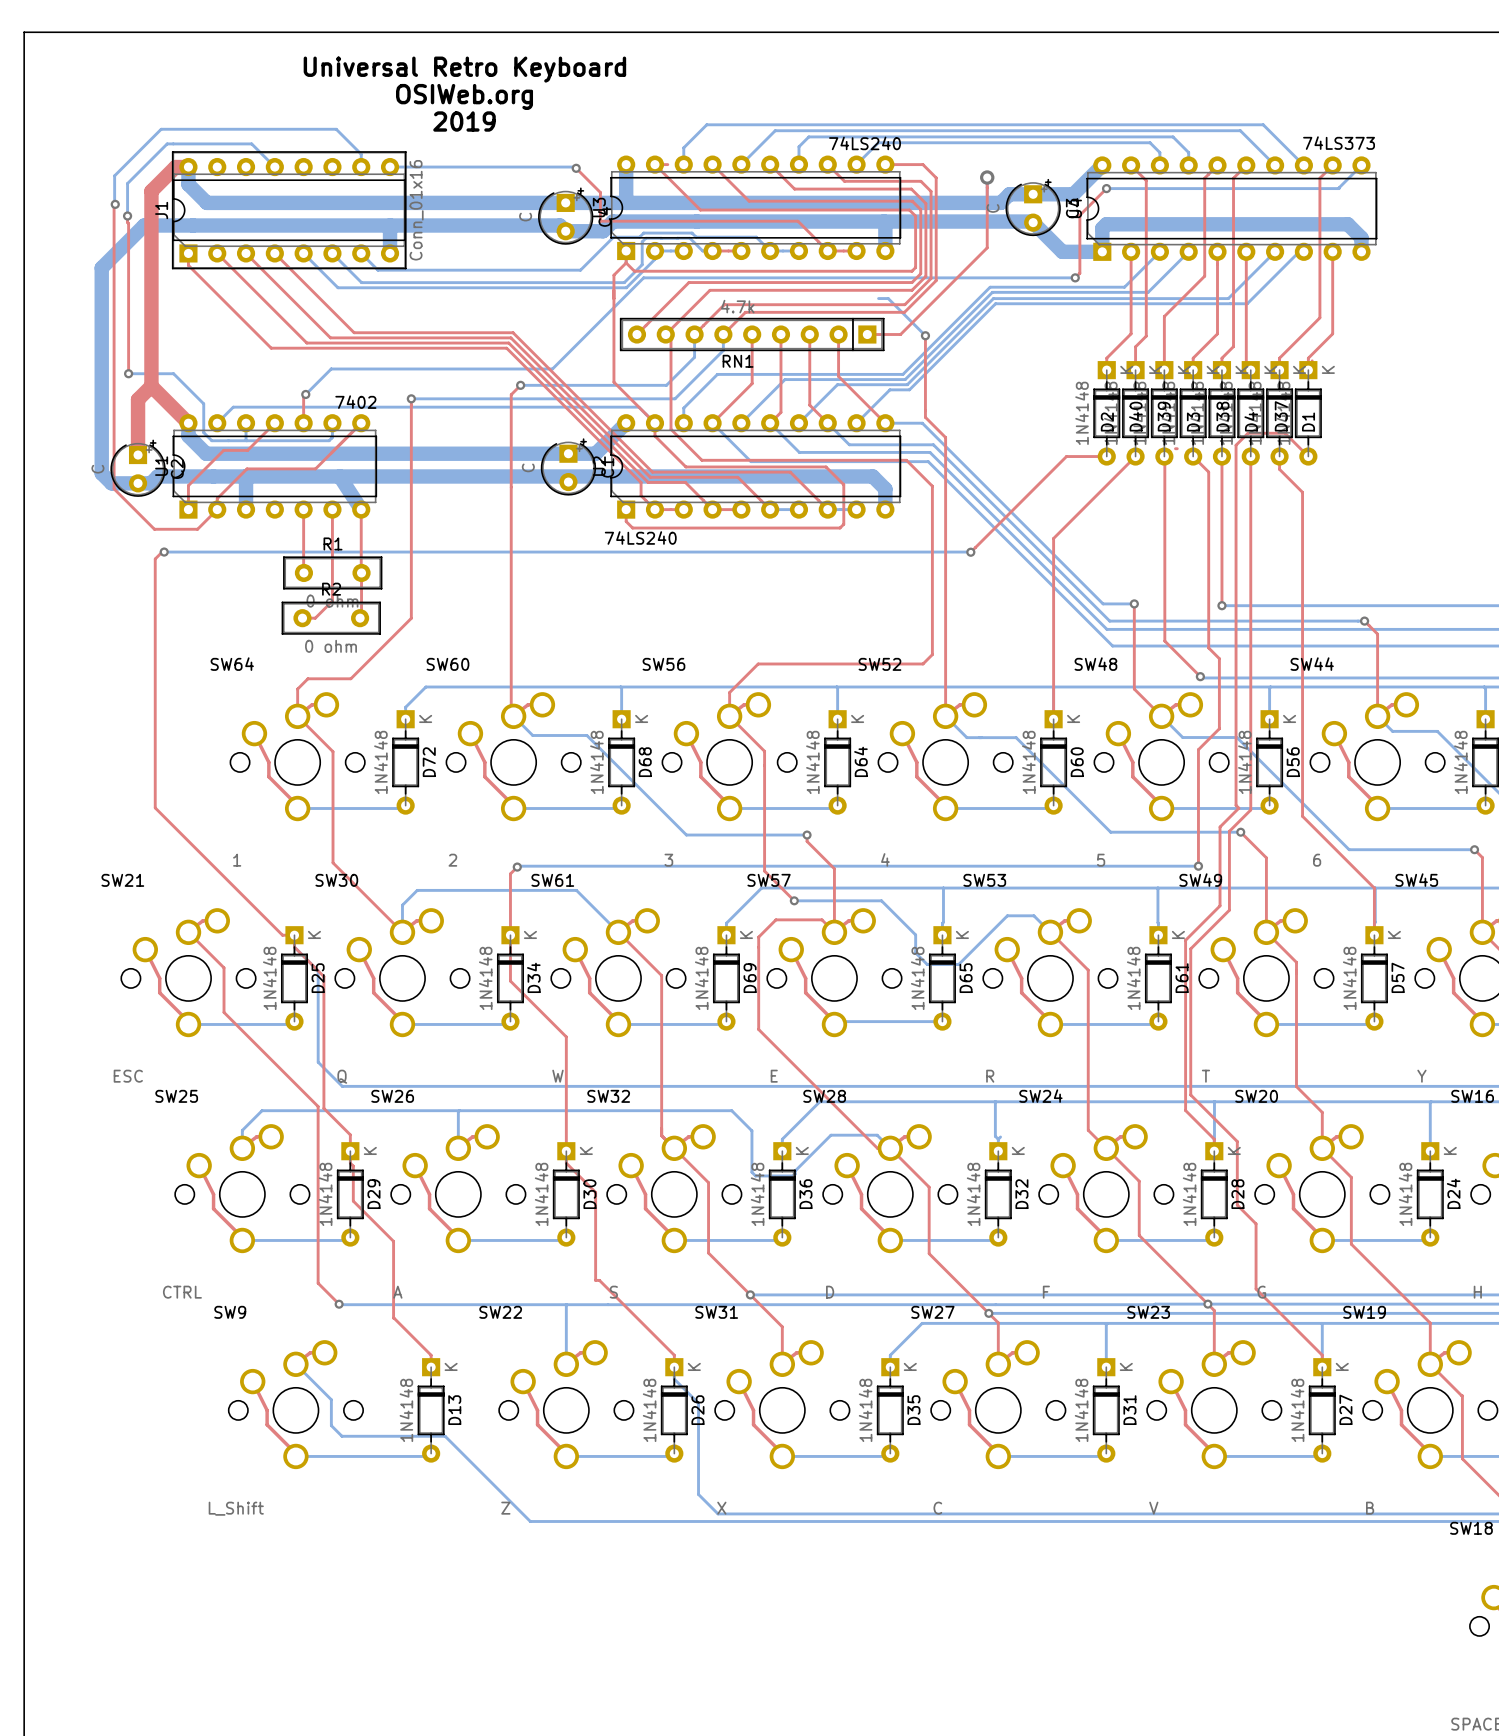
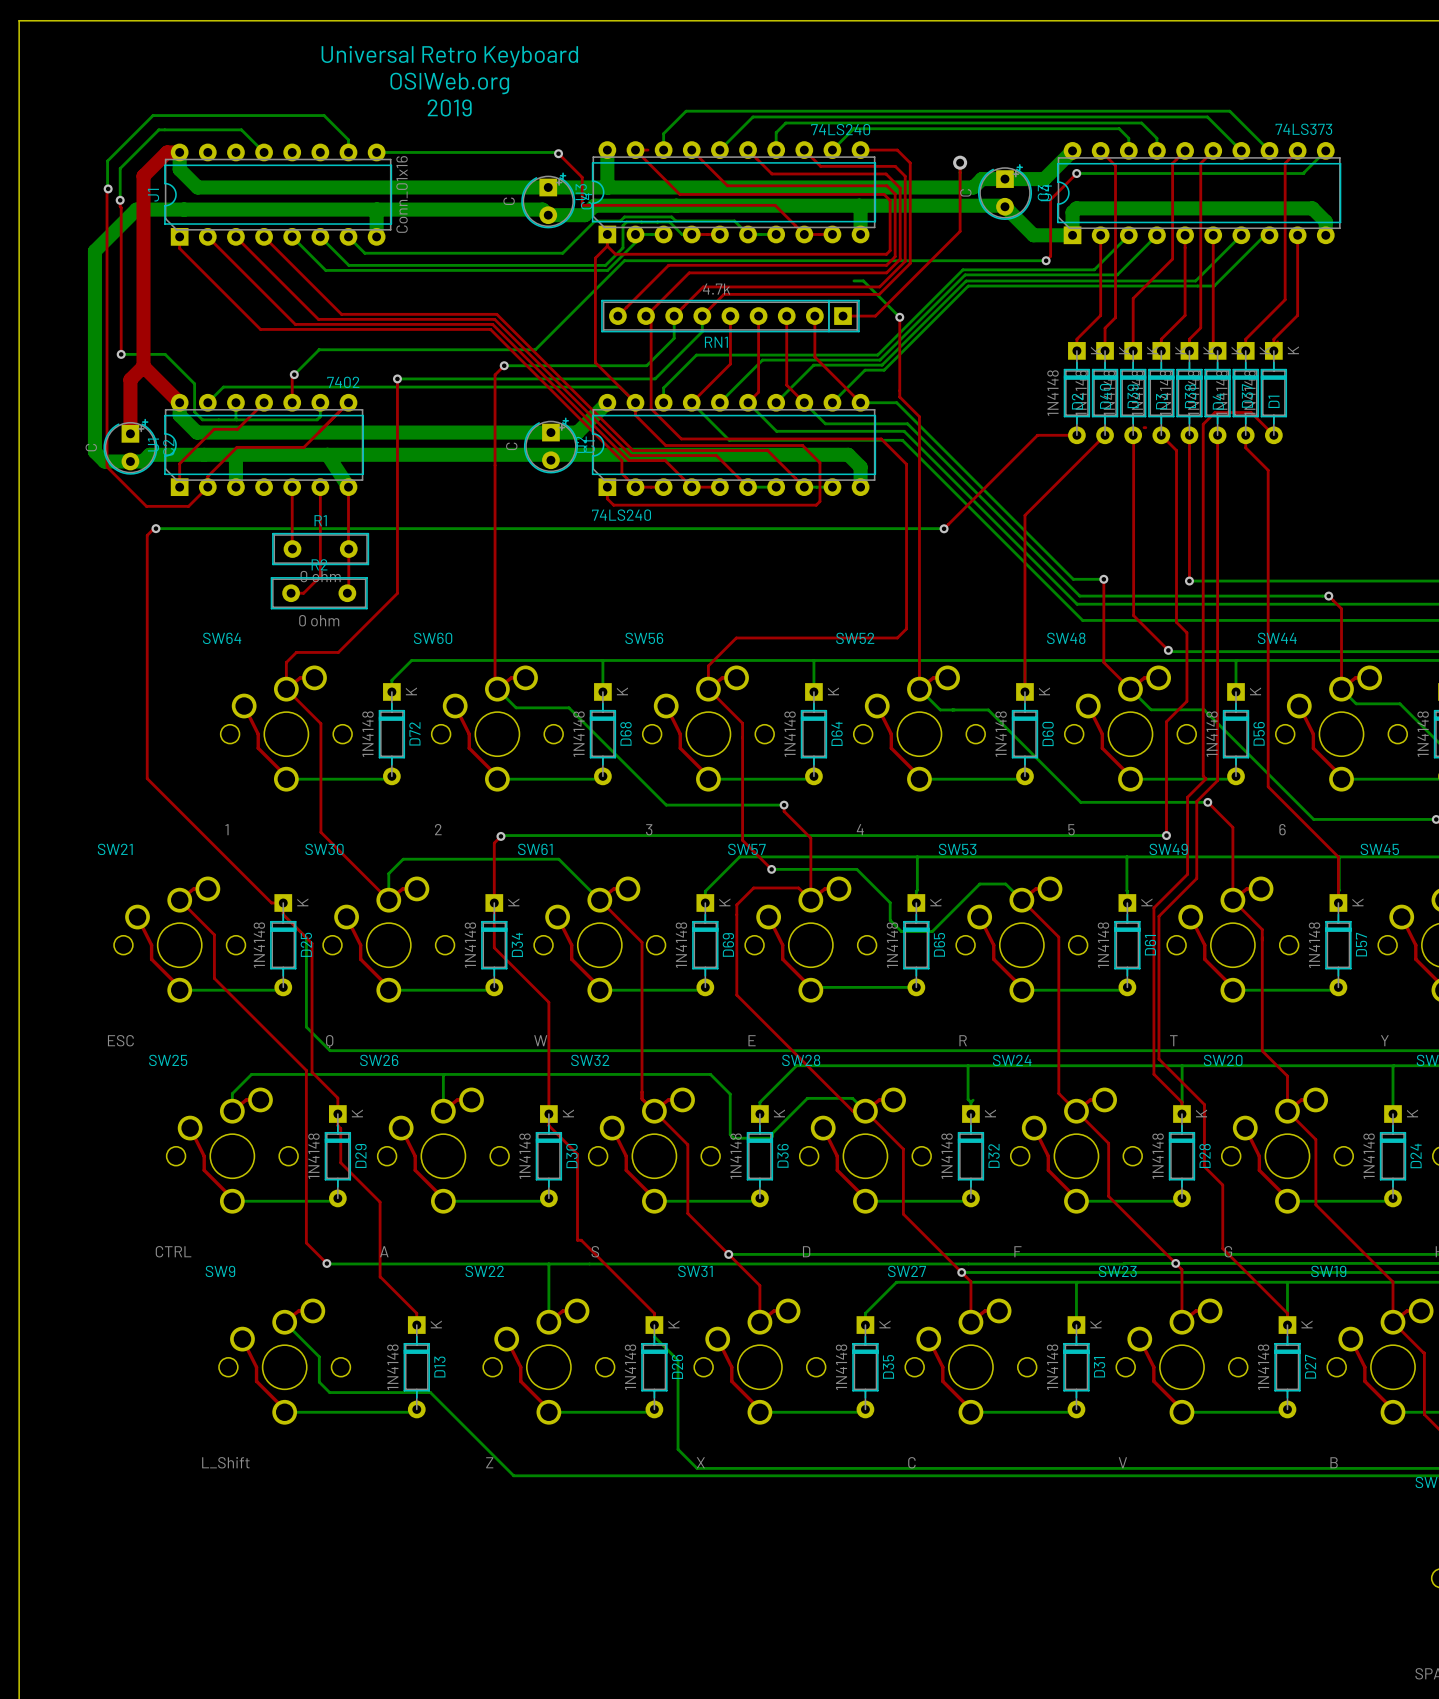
J1 footprint: [172, 151, 407, 270] -> [164, 143, 393, 246]

